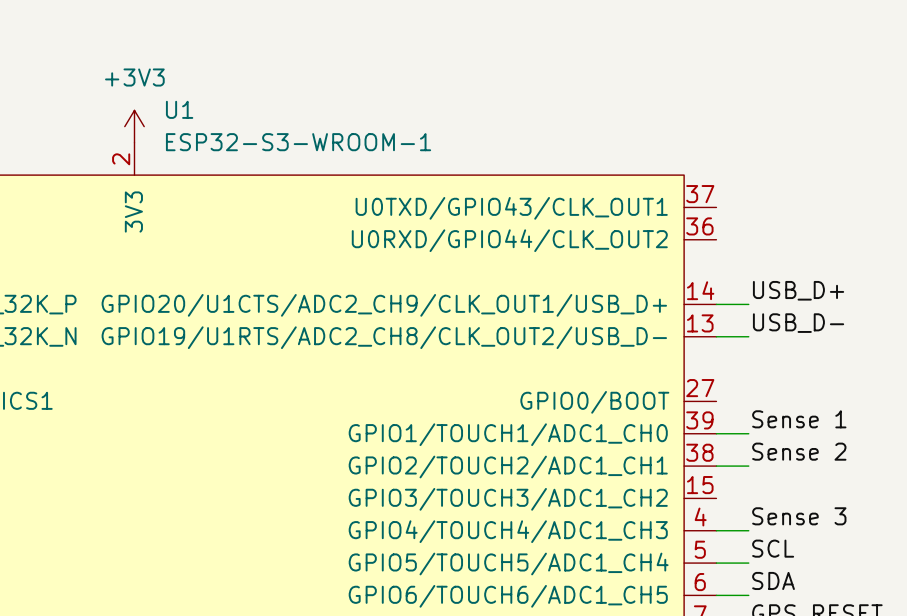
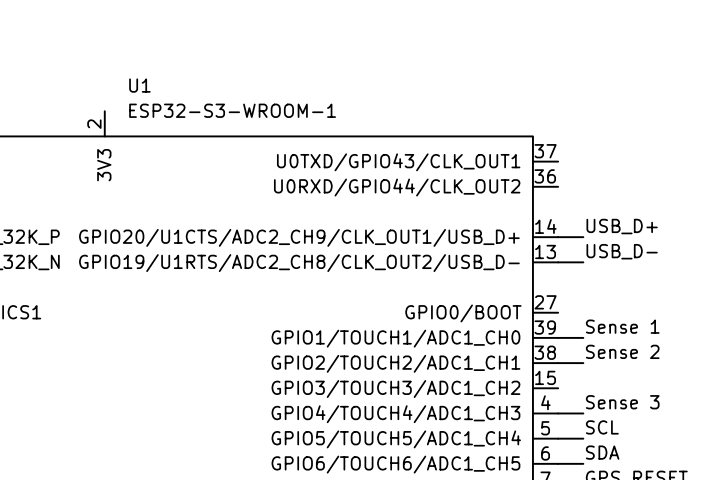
power symbol: +3V3 (134, 126) -> none

